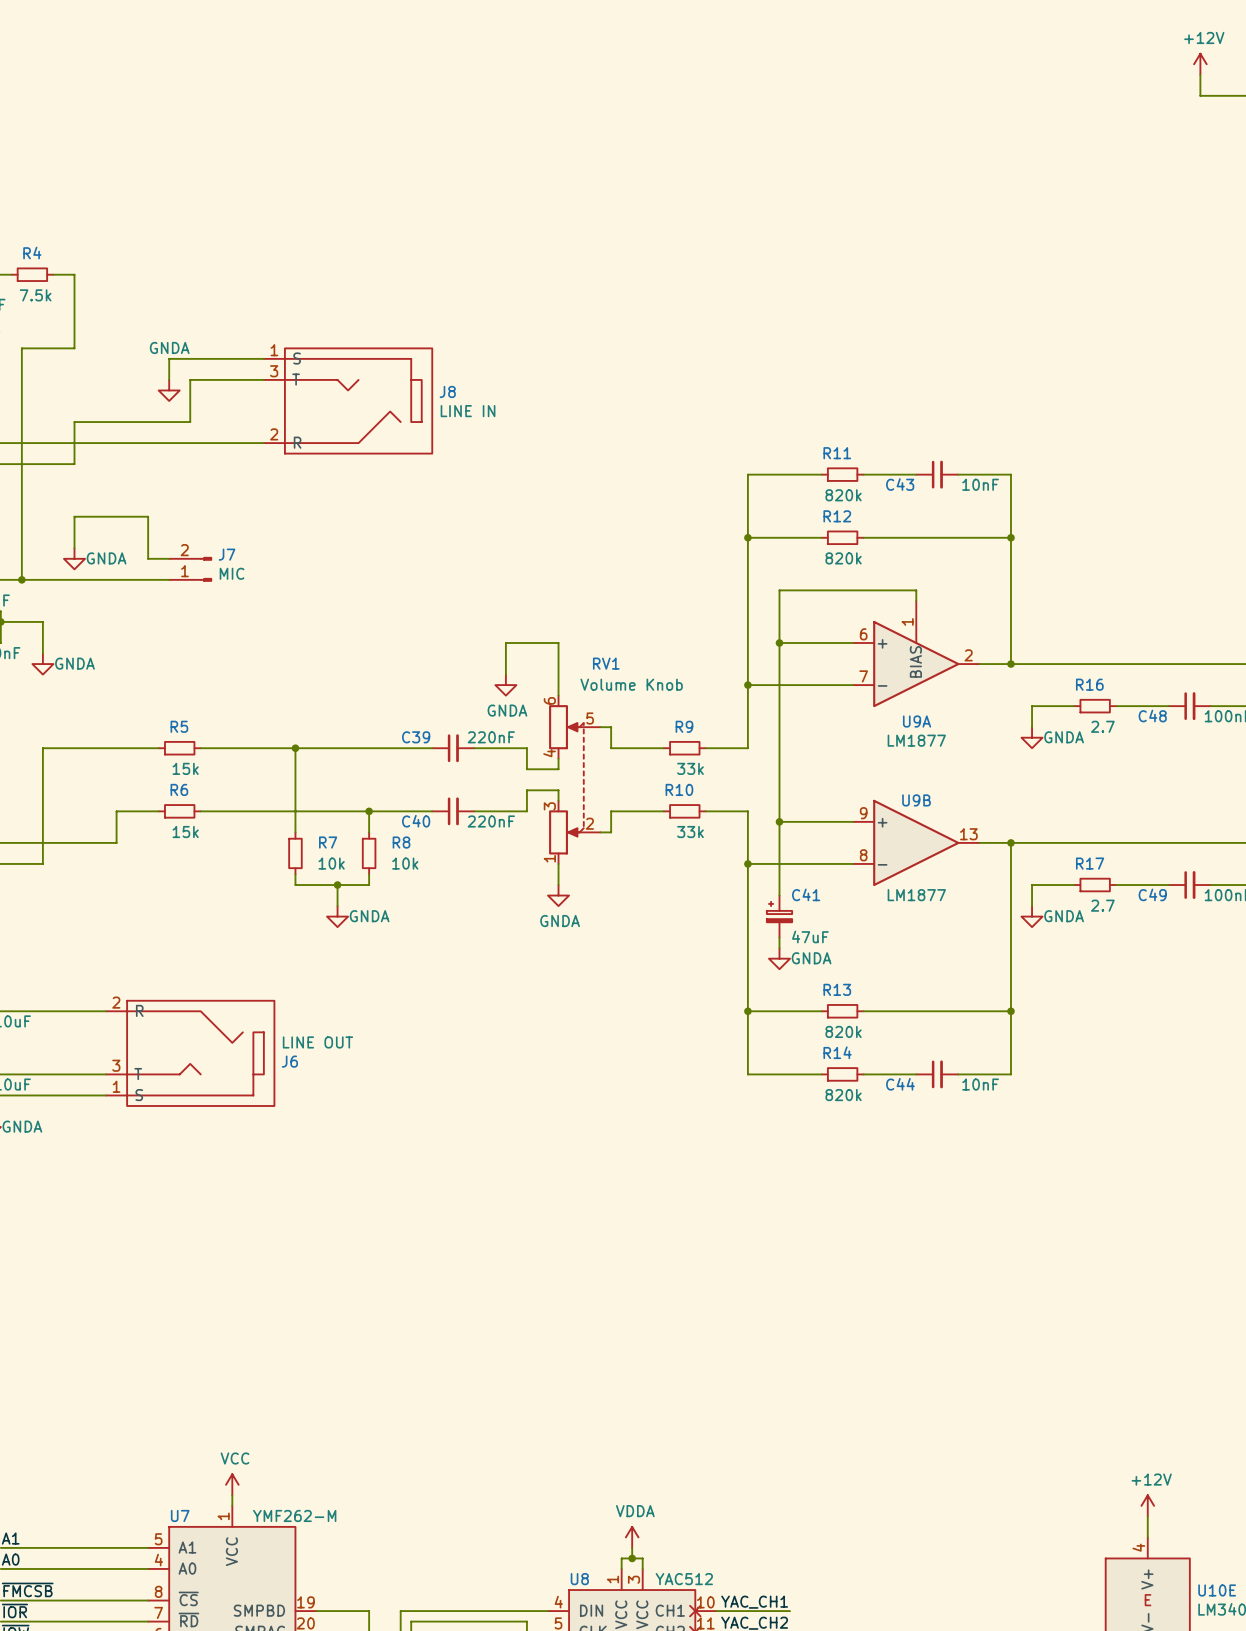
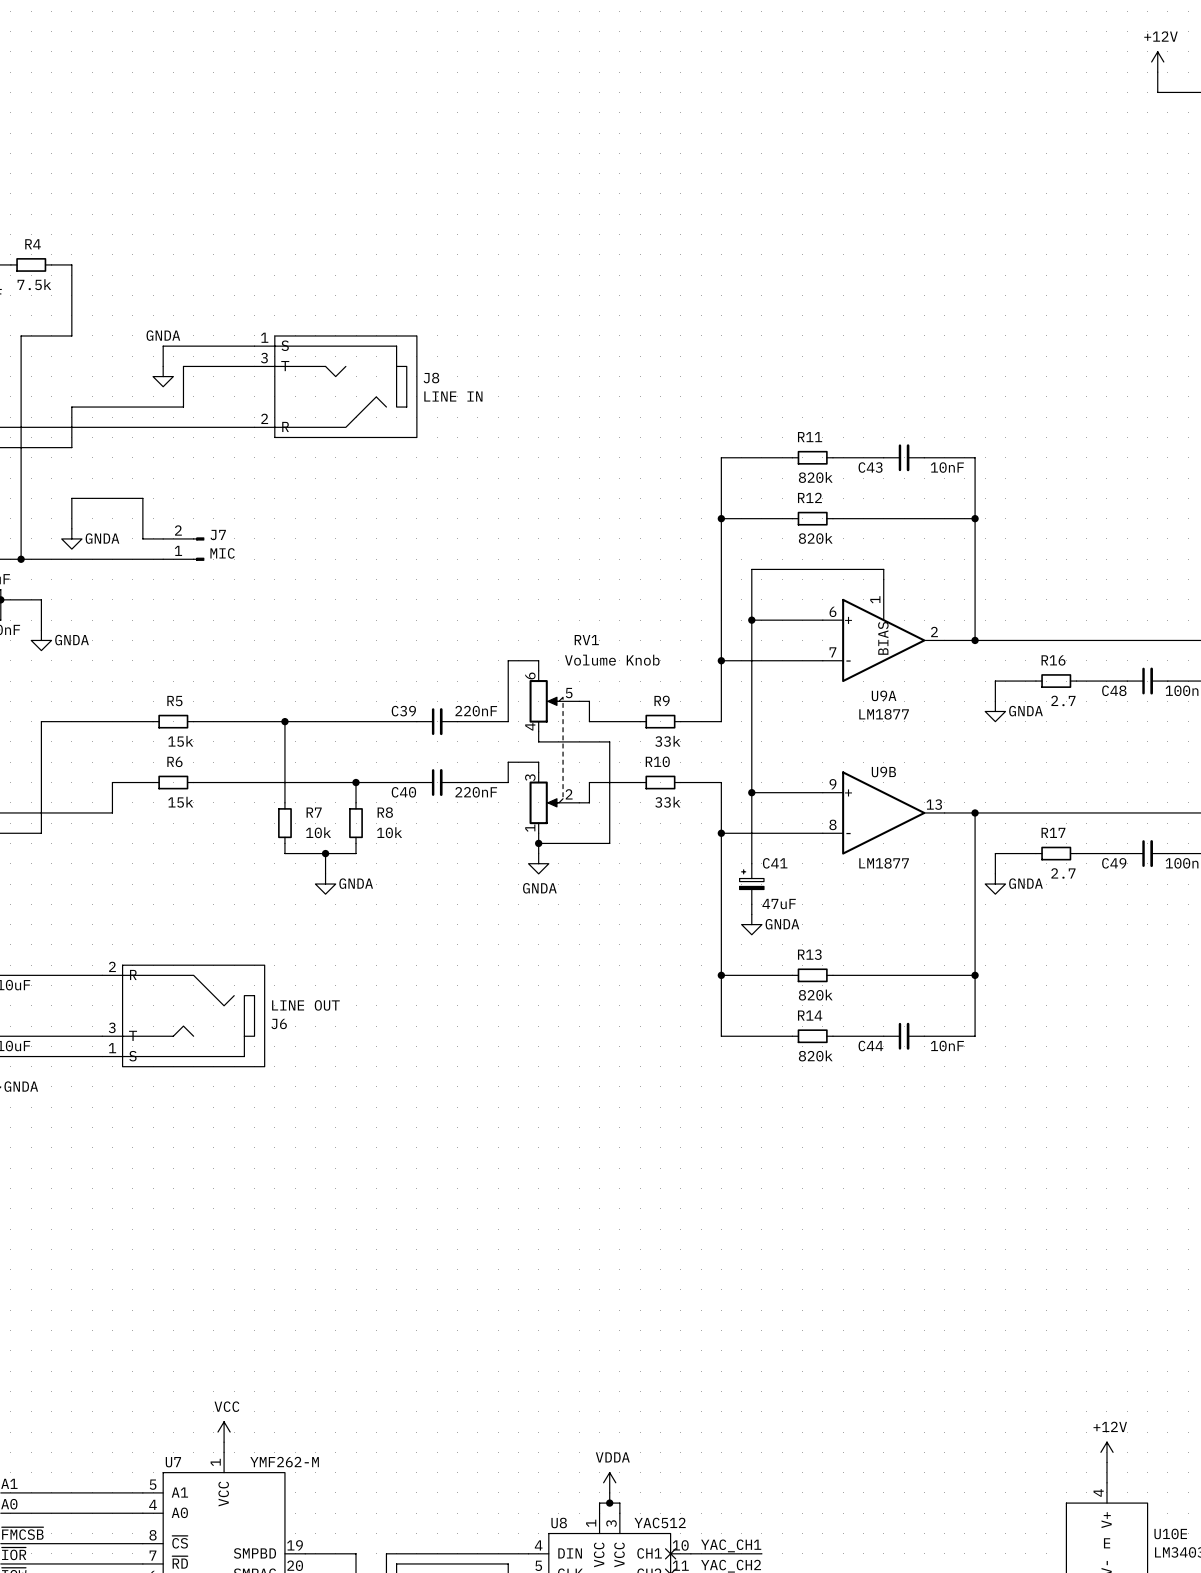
wire: (505, 674) (505, 643) (558, 643) (558, 685) -> (508, 721) (508, 660) (538, 660)
power symbol: GNDA (505, 685) -> none
wire: (526, 748) (526, 769) (558, 769) -> (538, 843) (609, 843) (609, 741) (538, 741)
junction: none -> (538, 843)

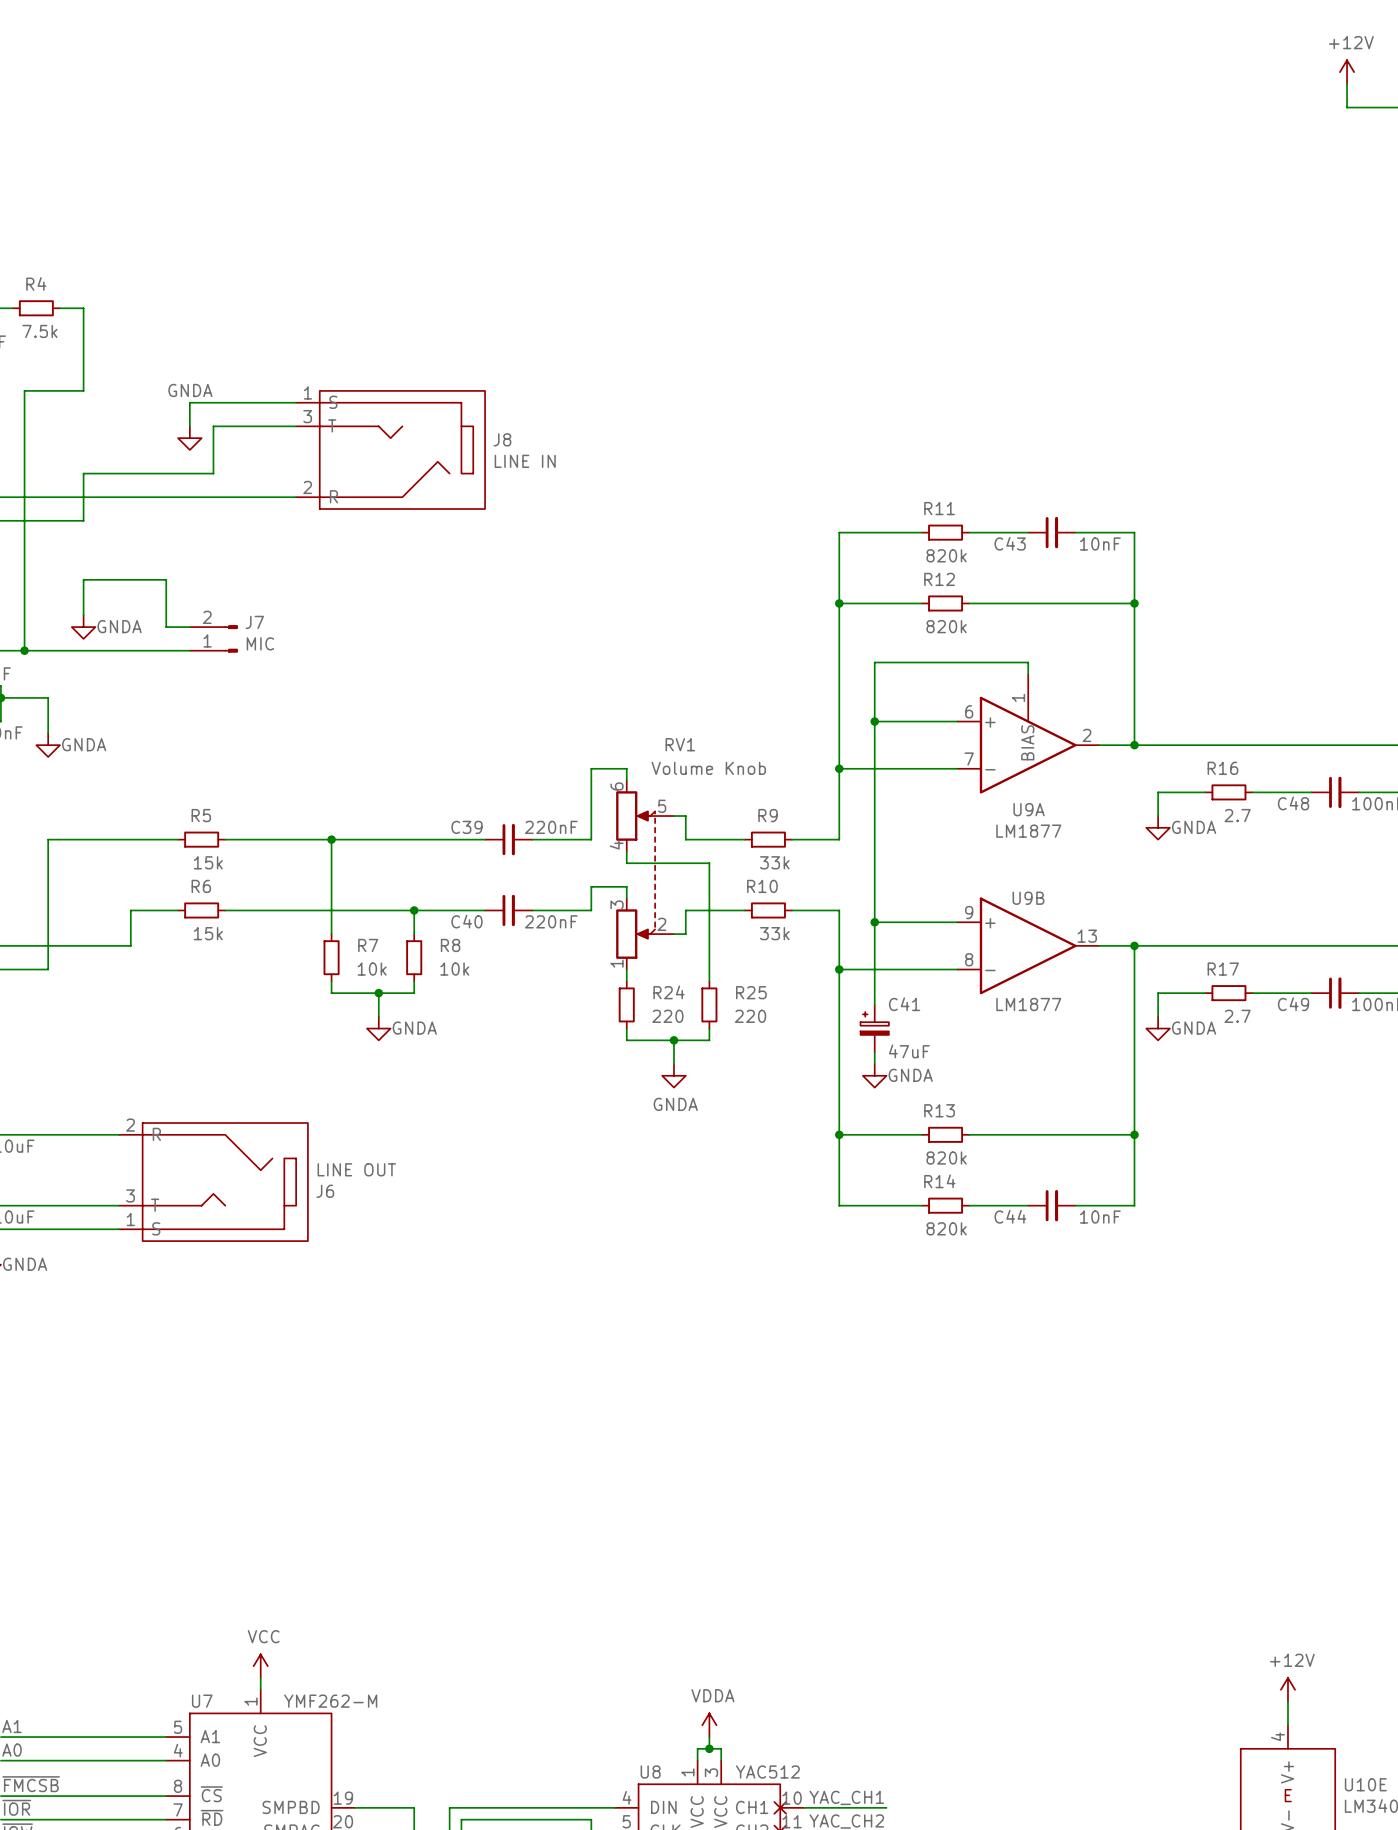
junction: (538, 843) -> none
wire: (609, 843) (538, 843) (538, 853) -> none
power symbol position: GNDA (538, 863) -> GNDA (673, 1075)
R24: none -> 220 (626, 1004)
R25: none -> 220 (709, 1004)
wire: none -> (626, 1028) (626, 1040) (709, 1040) (709, 1028)
wire: none -> (673, 1040) (673, 1063)
junction: none -> (673, 1040)

